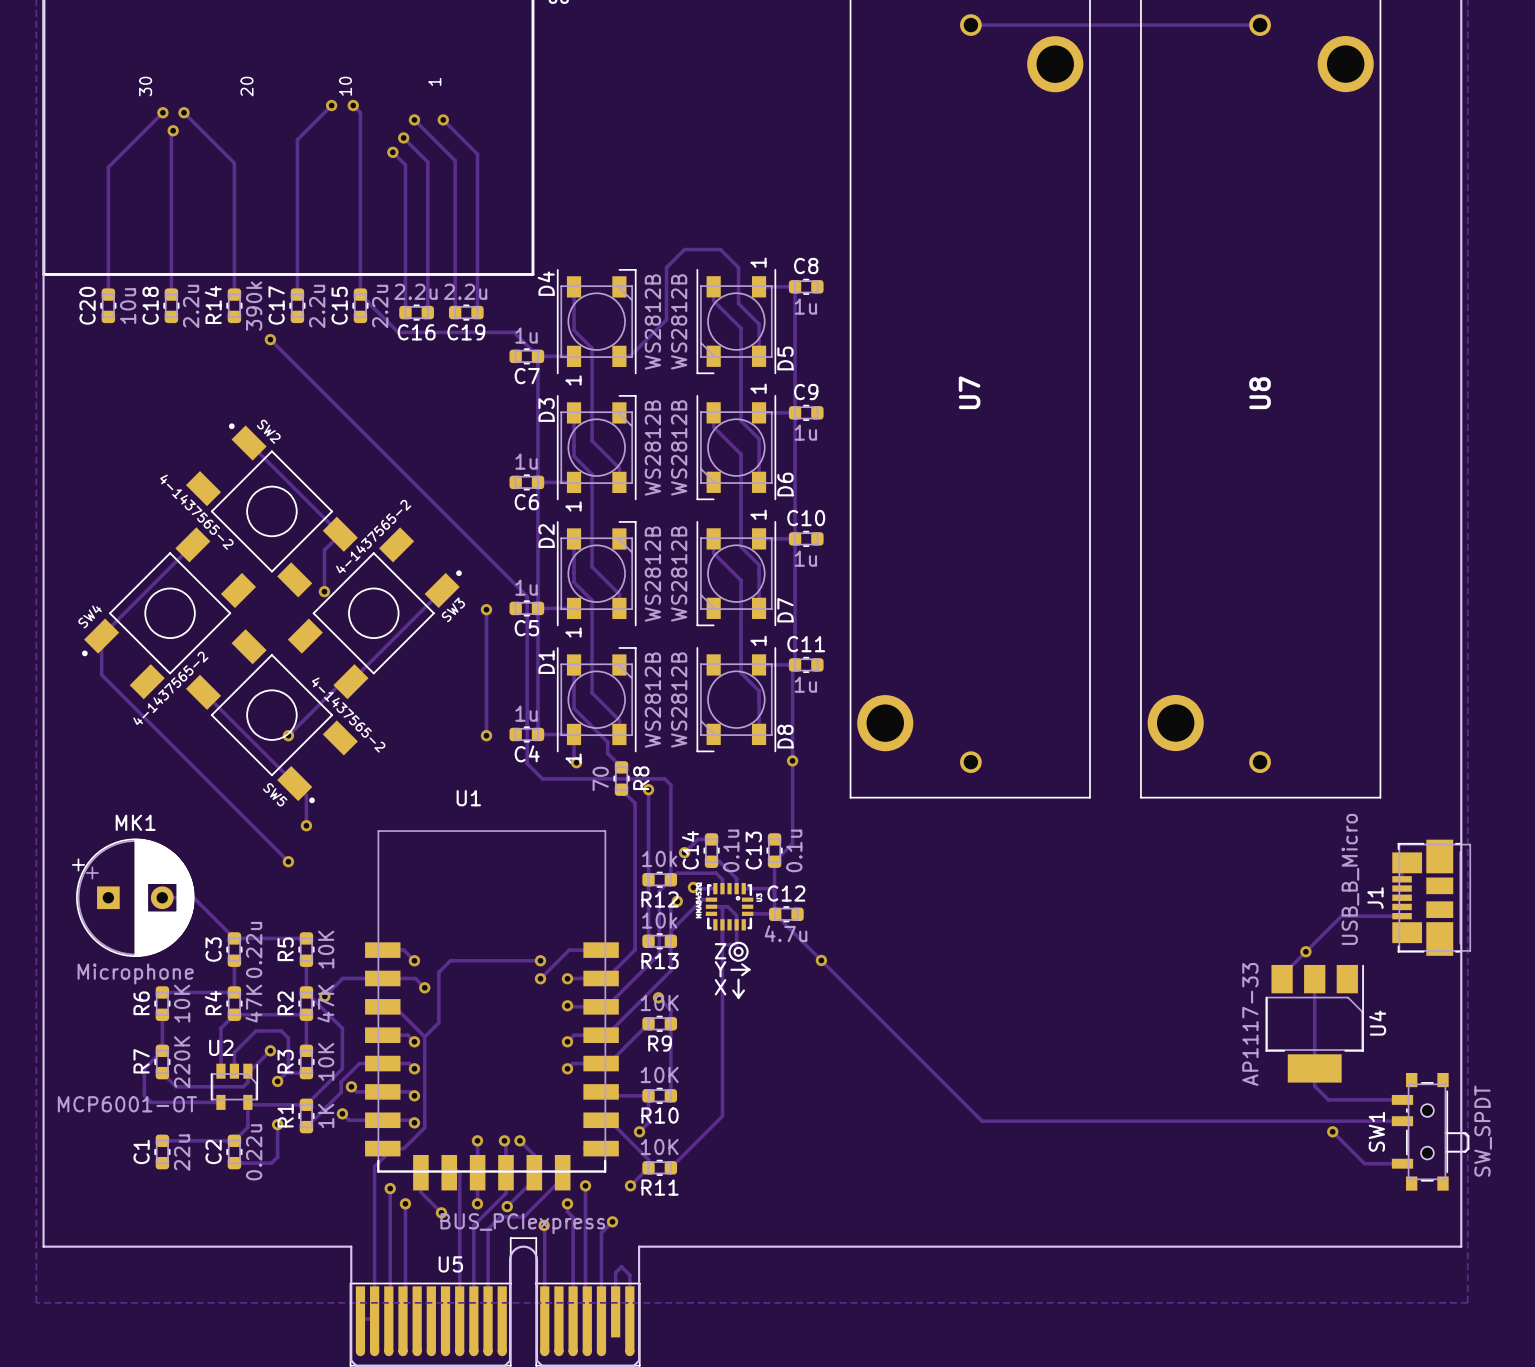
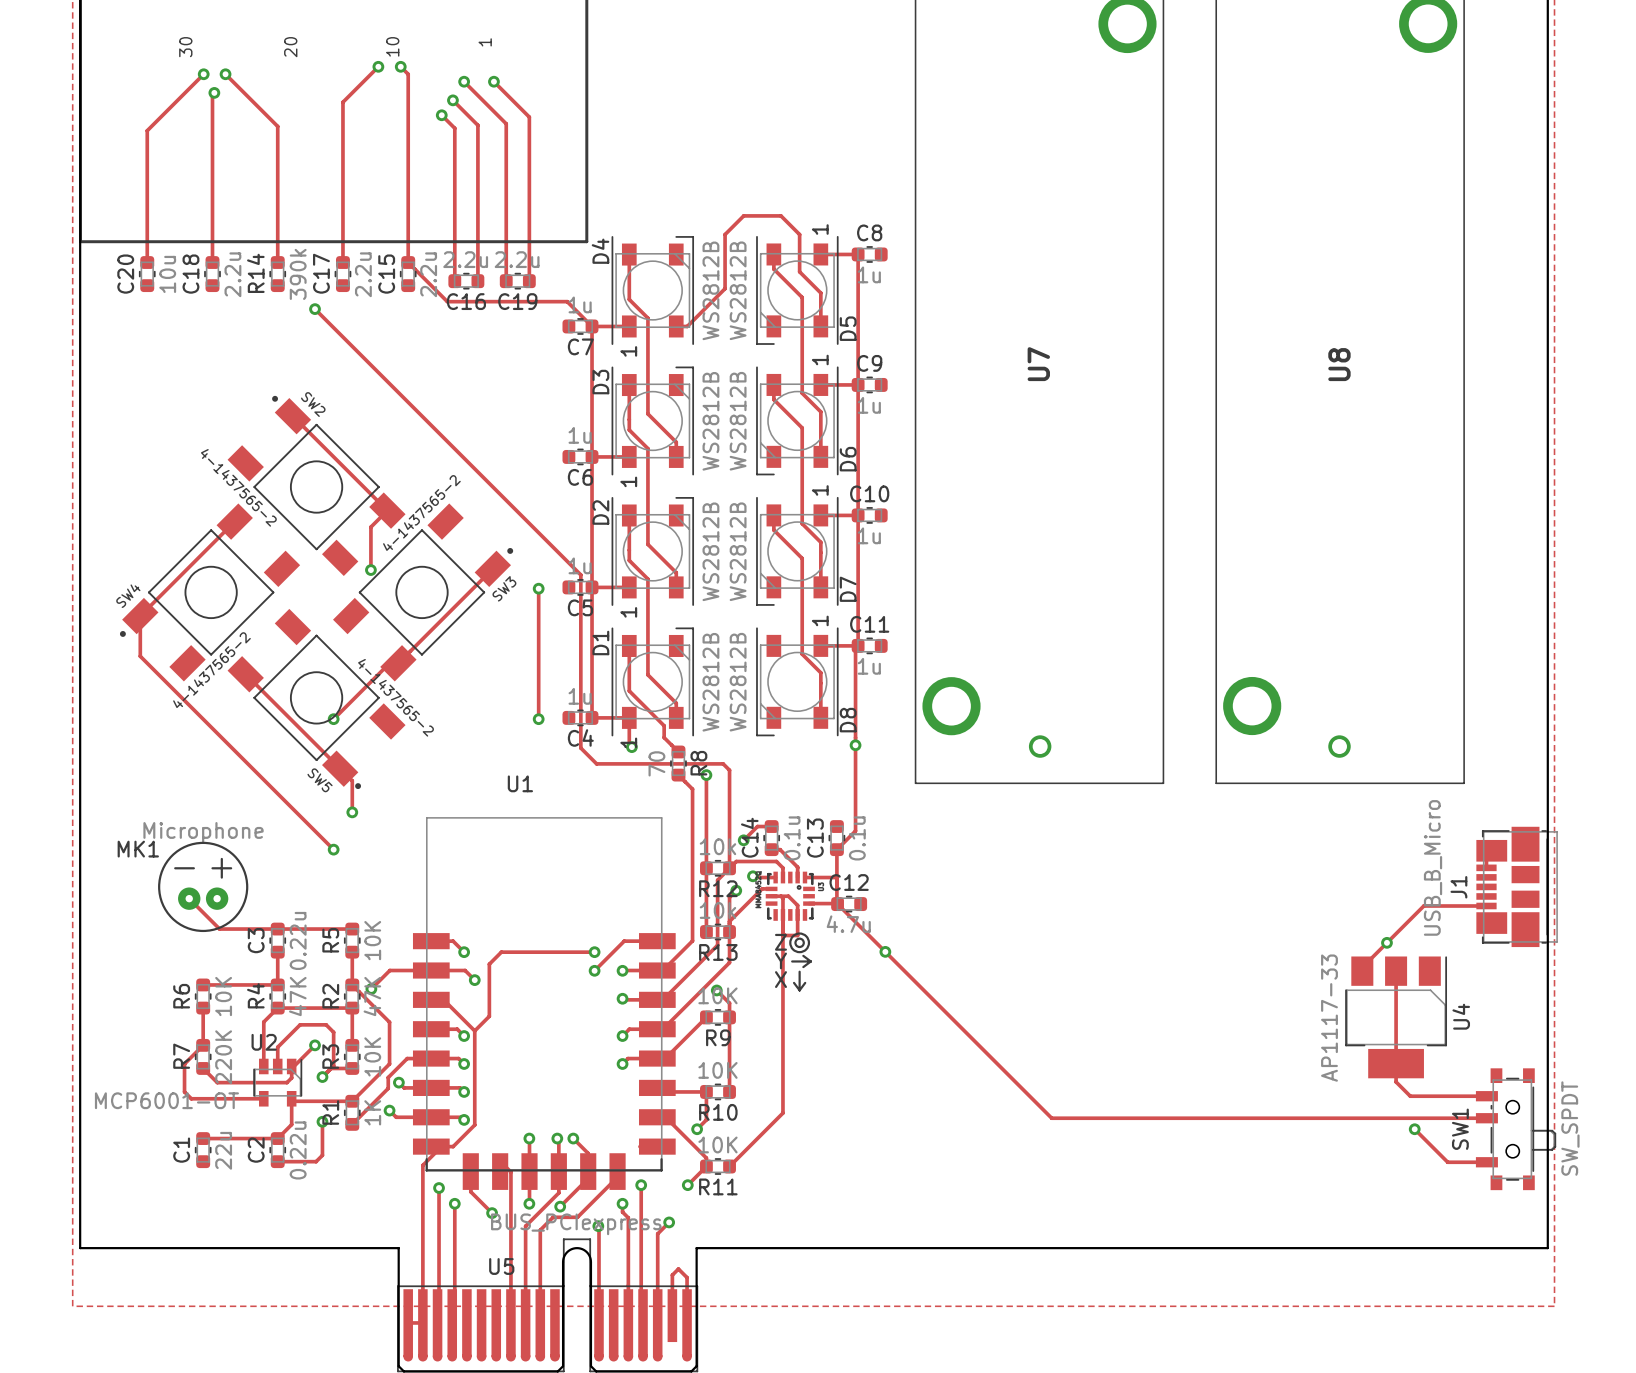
MK1 name position: MK1 (135, 822) -> MK1 (138, 849)
MK1 footprint: [71, 838, 195, 958] -> [158, 841, 249, 933]
track: (162, 897) (193, 897) (234, 938) -> (189, 898) (219, 929) (277, 929)
MK1 value position: Microphone (135, 974) -> Microphone (203, 832)

